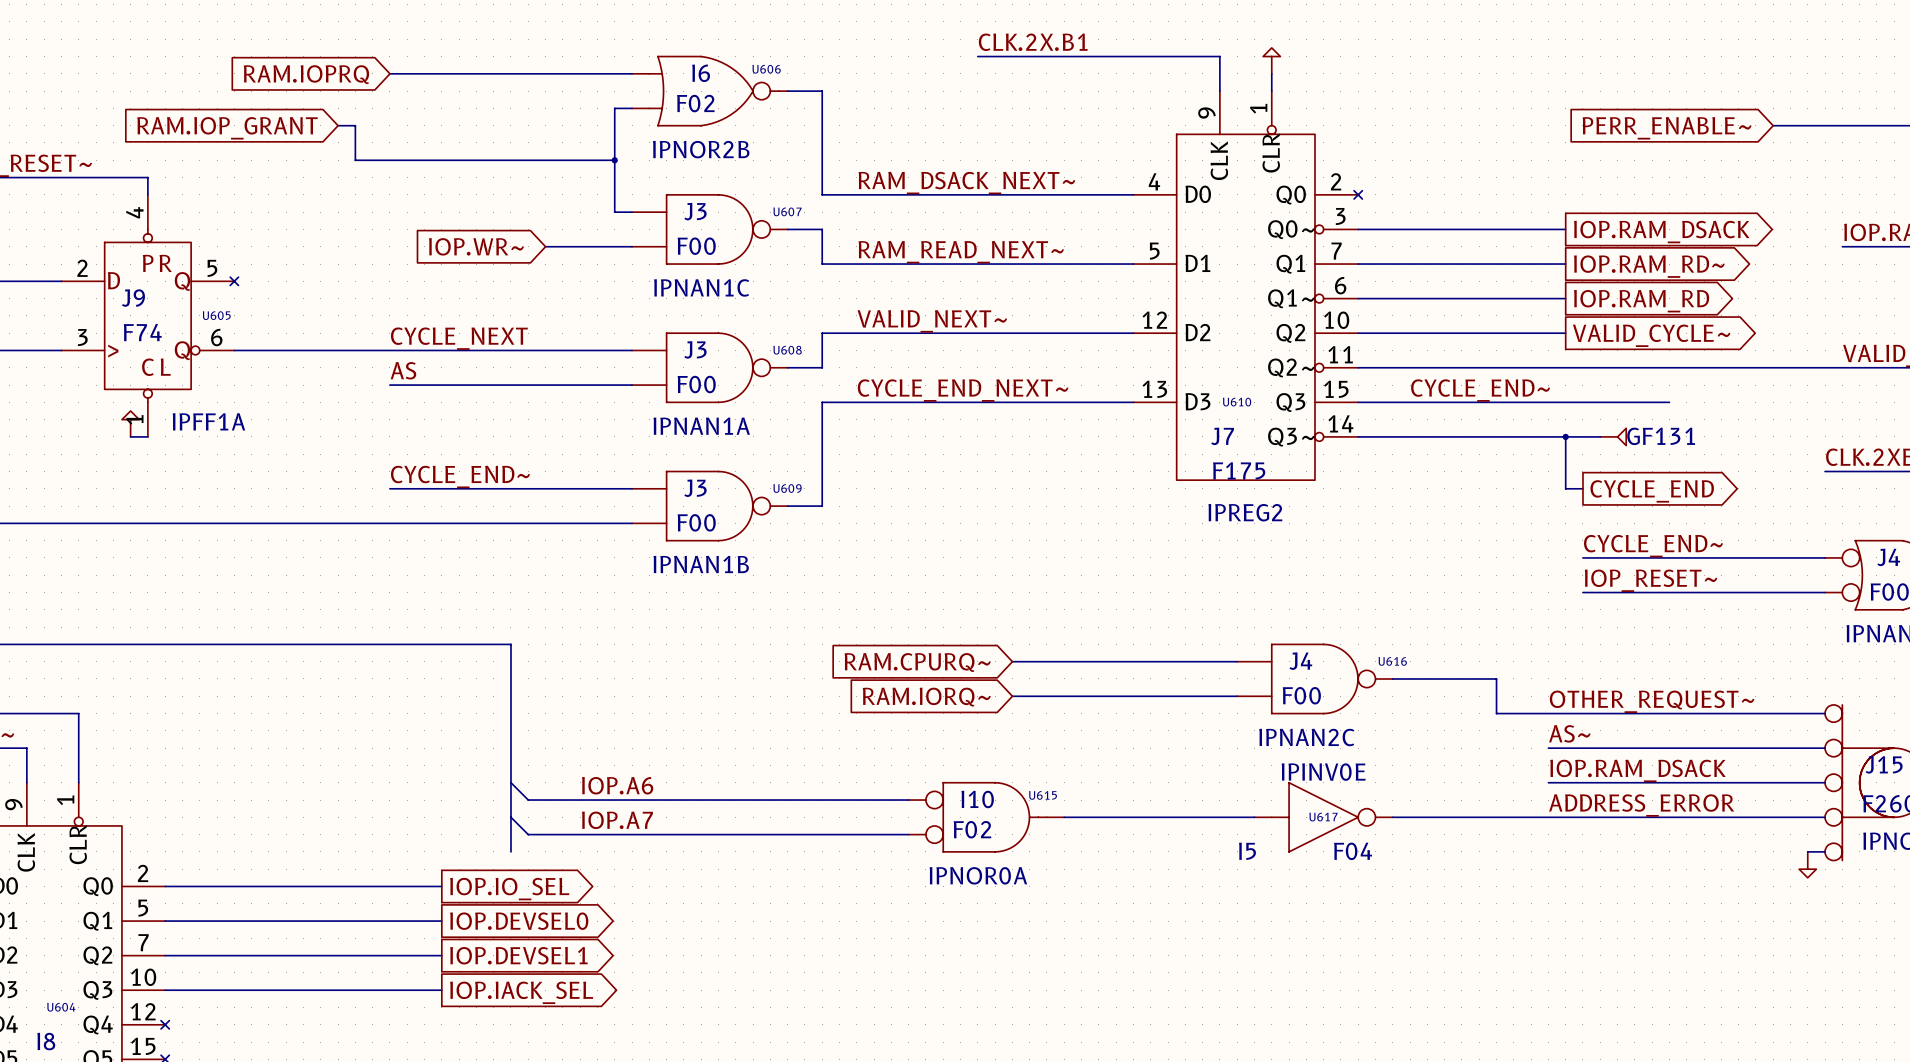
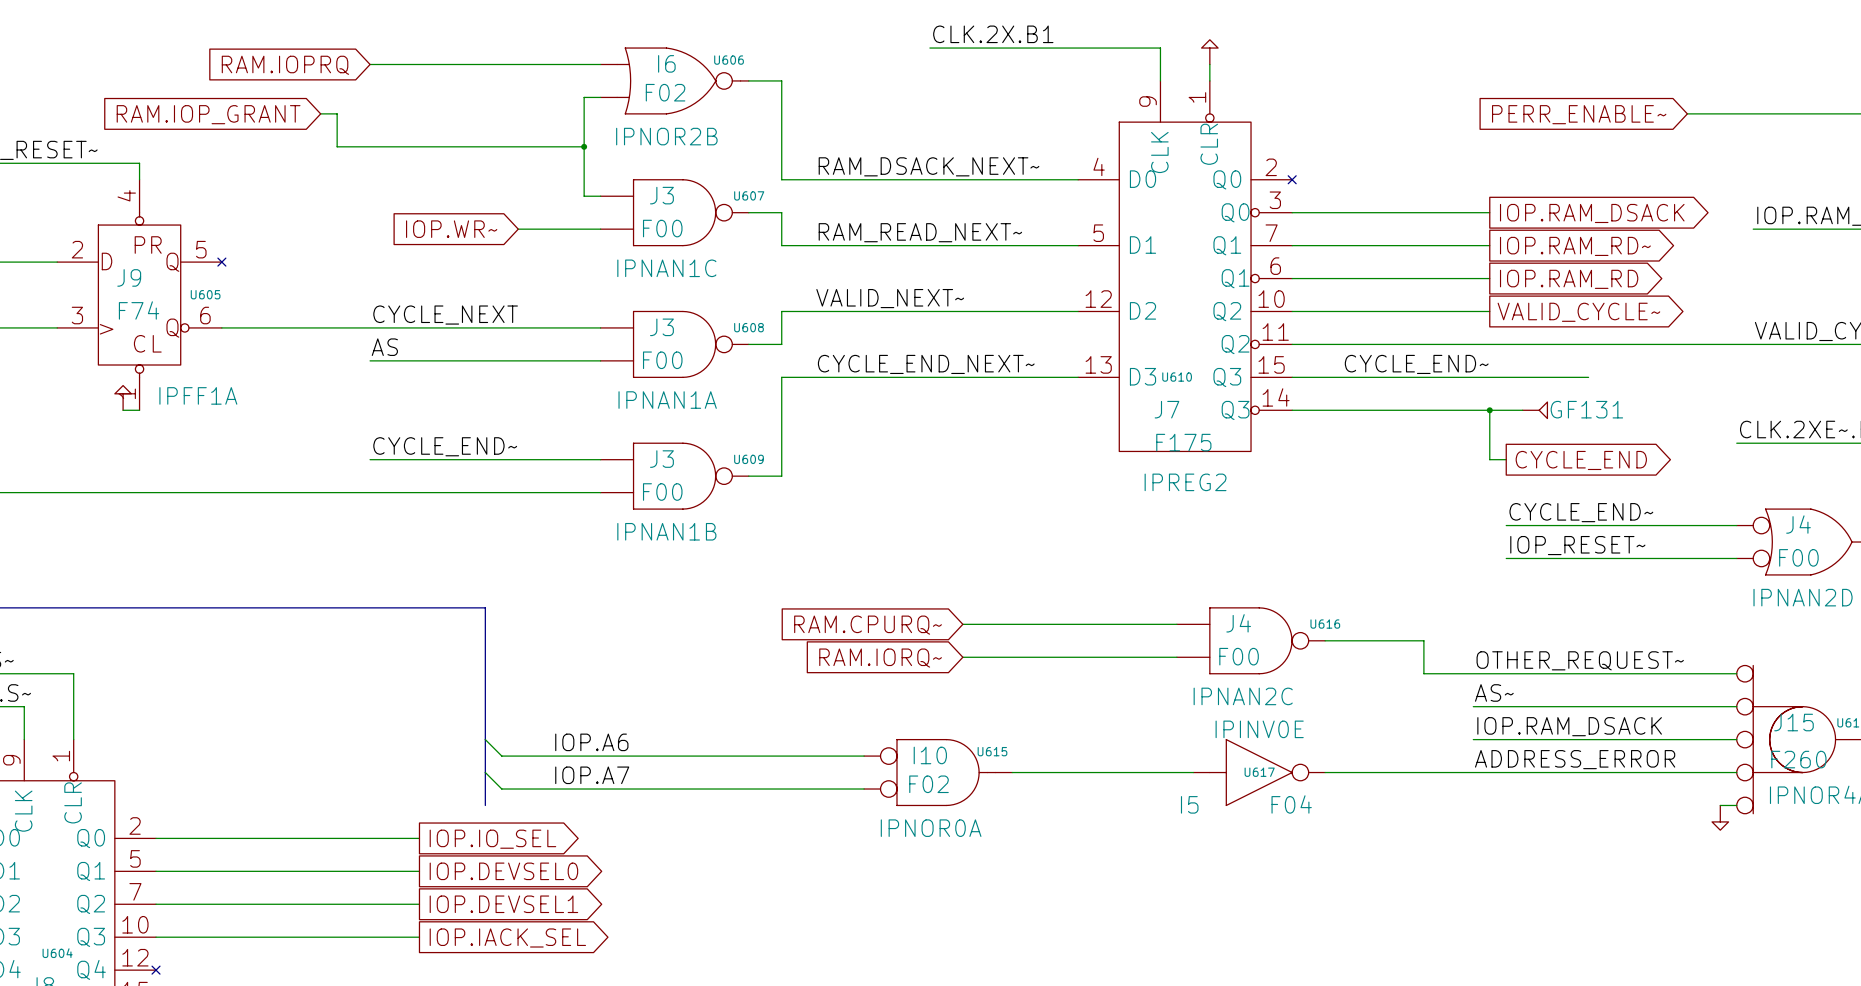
U610 pin name: Q0~ (1291, 229) -> Q0 (1235, 212)
U610 pin name: Q1~ (1291, 298) -> Q1 (1235, 278)
U610 pin name: Q2~ (1291, 367) -> Q2 (1235, 344)
U610 pin name: Q3~ (1291, 437) -> Q3 (1235, 410)

